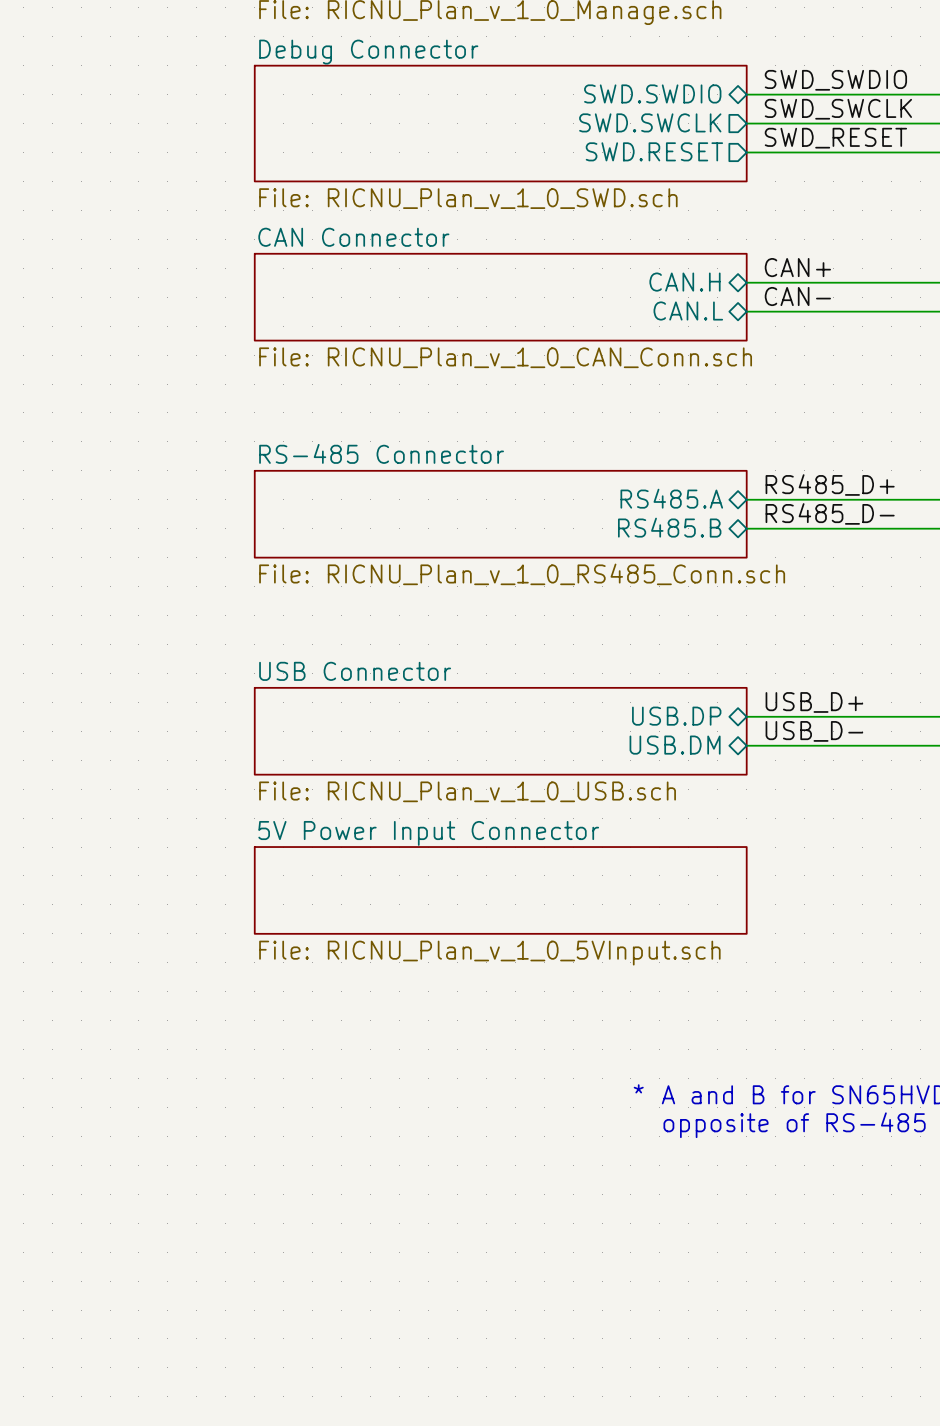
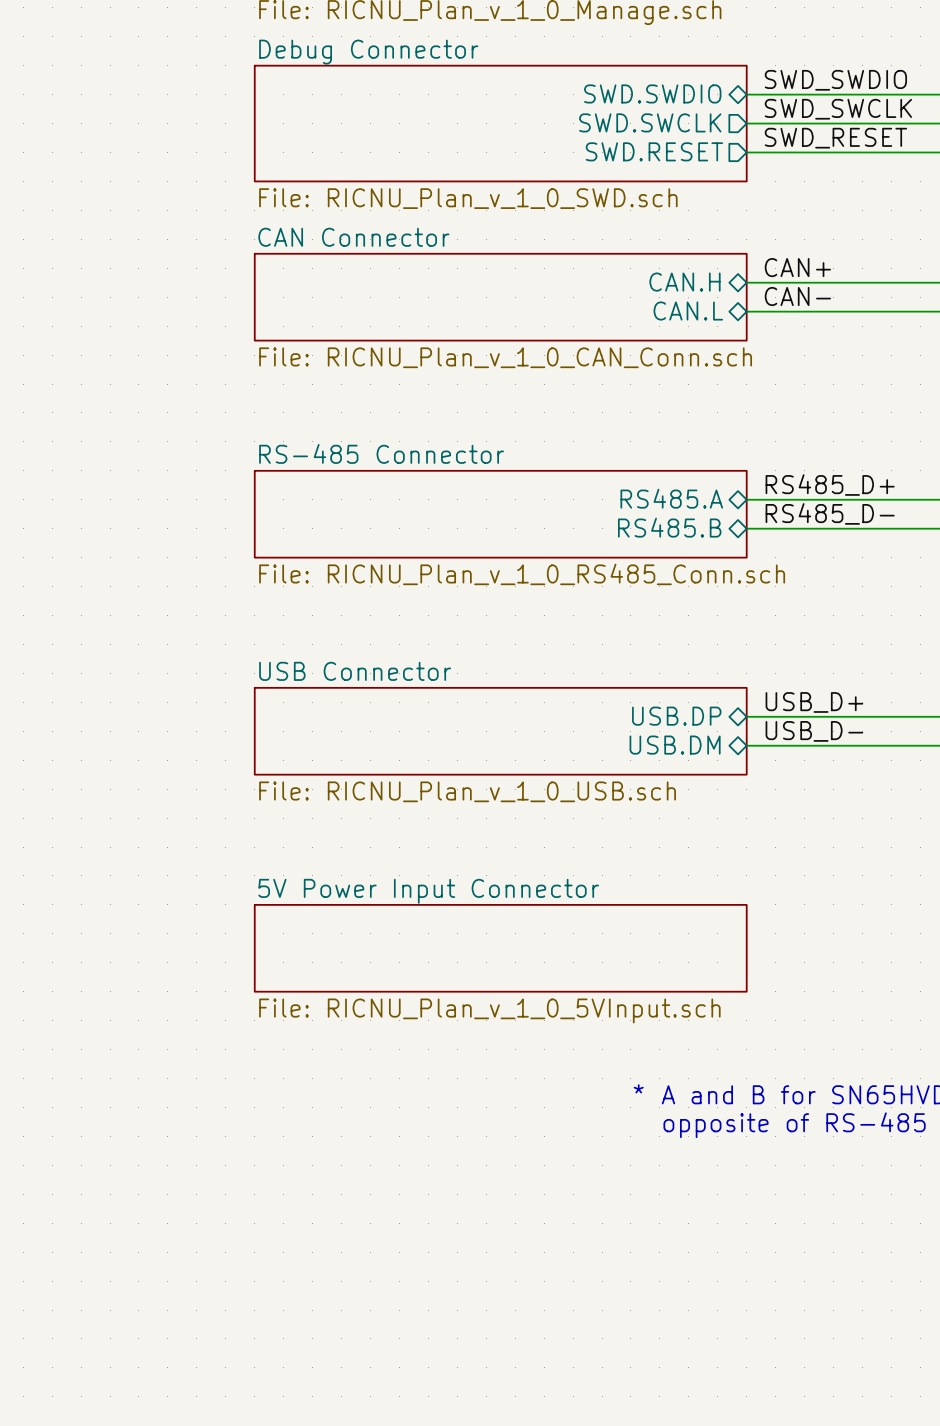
sheet 5V Power Input Connector position: (500, 890) -> (500, 948)

